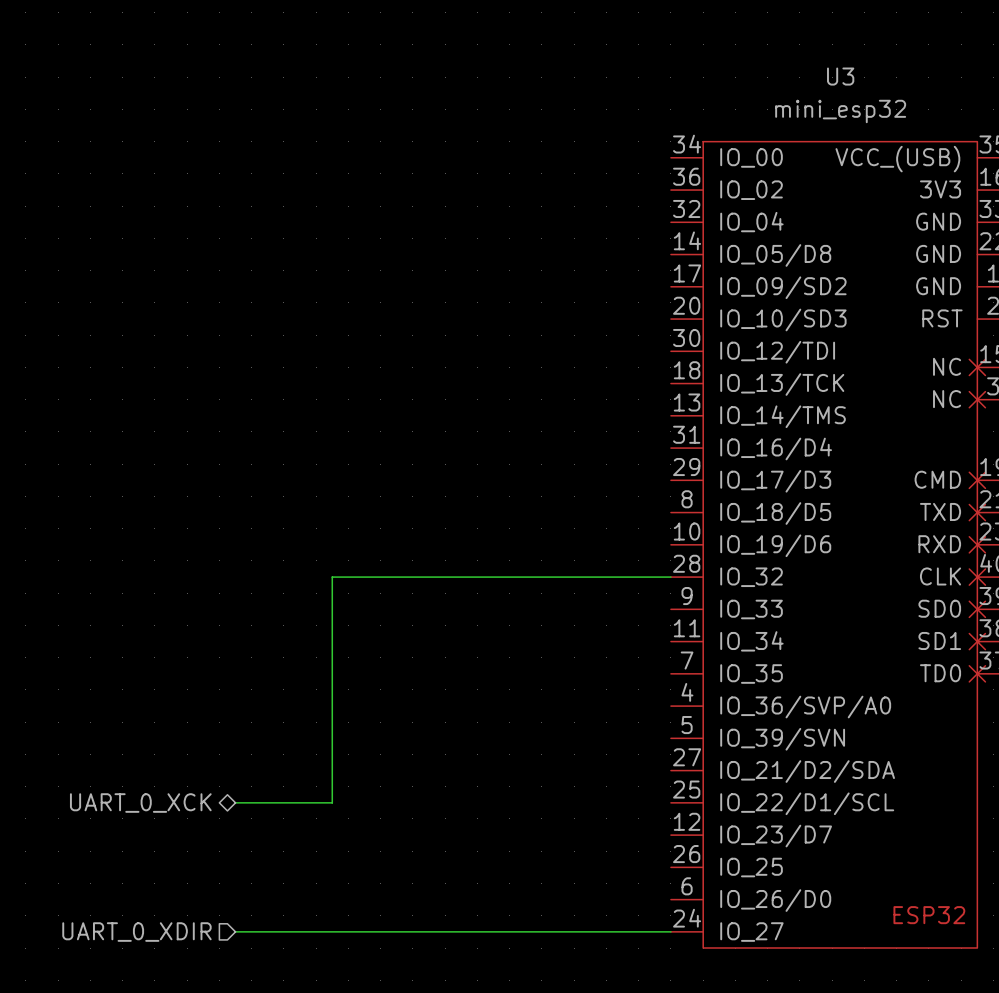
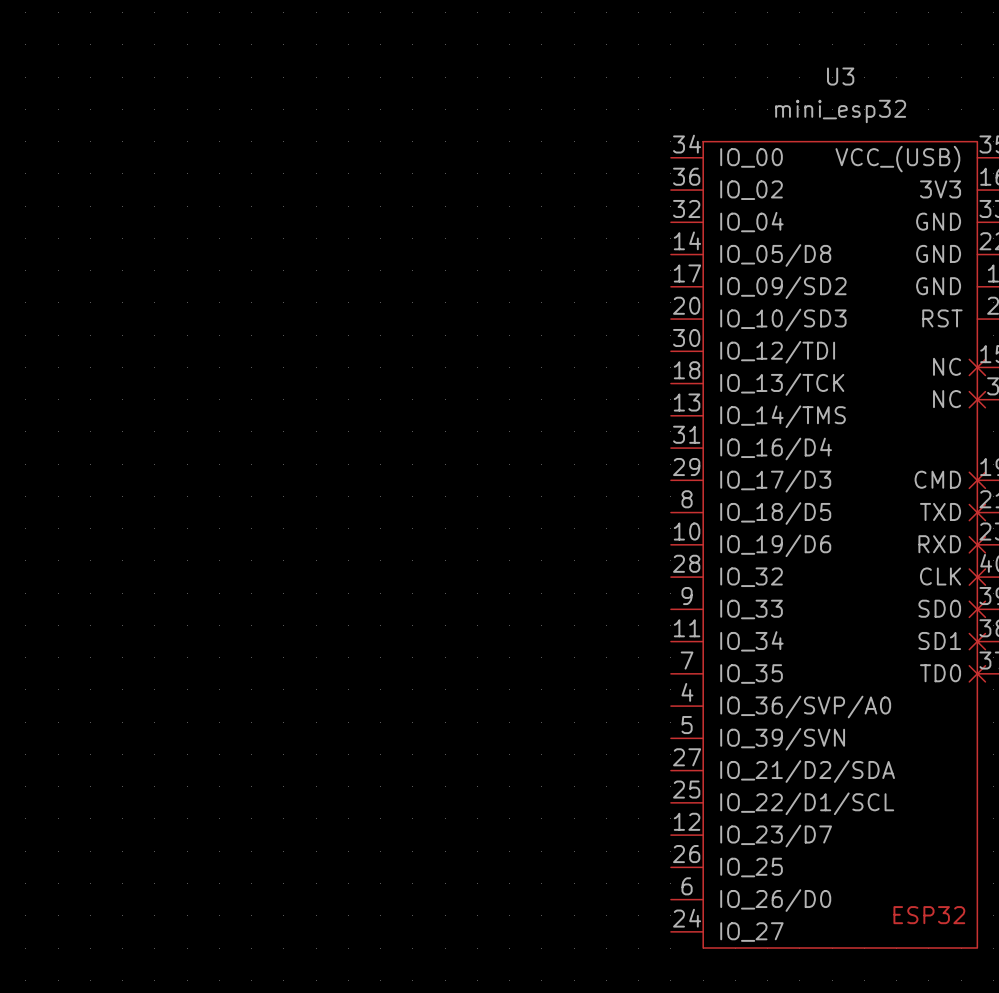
wire: (670, 577) (332, 577) (332, 802) (235, 802) -> none
hierarchical label: UART_0_XCK (140, 803) -> none
wire: (235, 931) (670, 931) -> none
hierarchical label: UART_0_XDIR (136, 932) -> none

